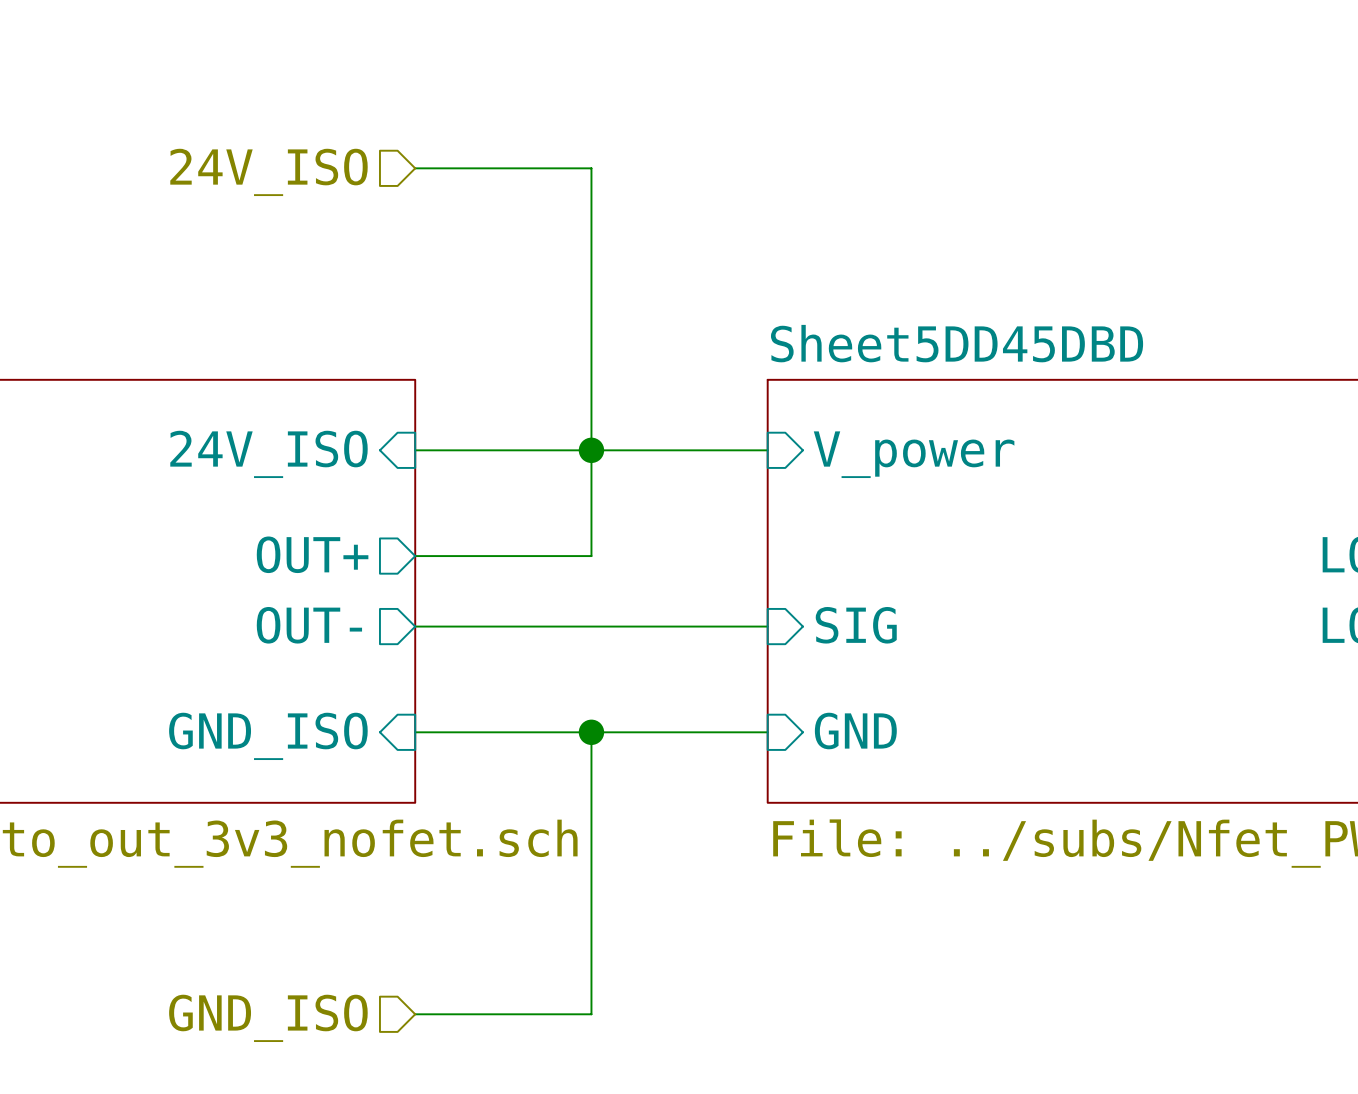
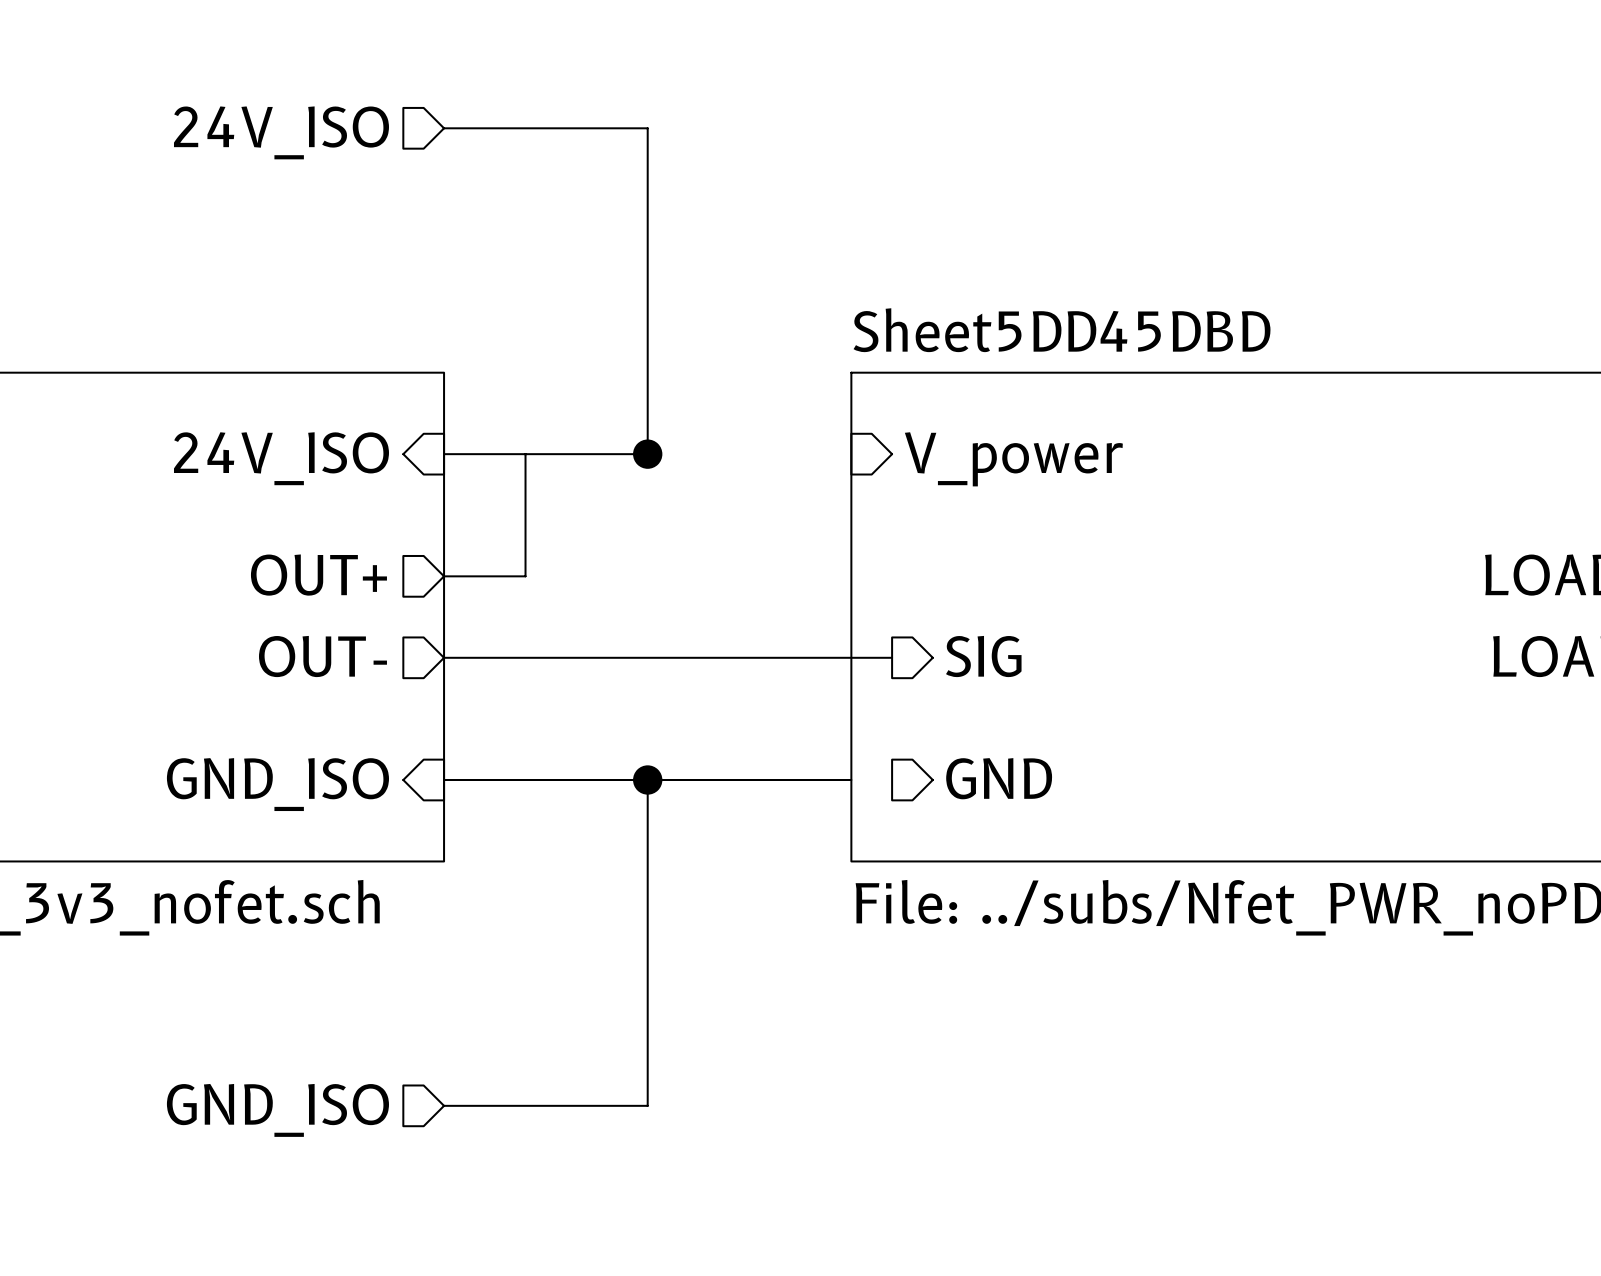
wire: (767, 450) (591, 450) (591, 556) (485, 556) -> (525, 454) (525, 576)
sheet pin position: SIG (856, 625) -> SIG (983, 656)
wire: none -> (851, 657) (892, 657)
sheet pin position: GND (855, 731) -> GND (999, 778)

